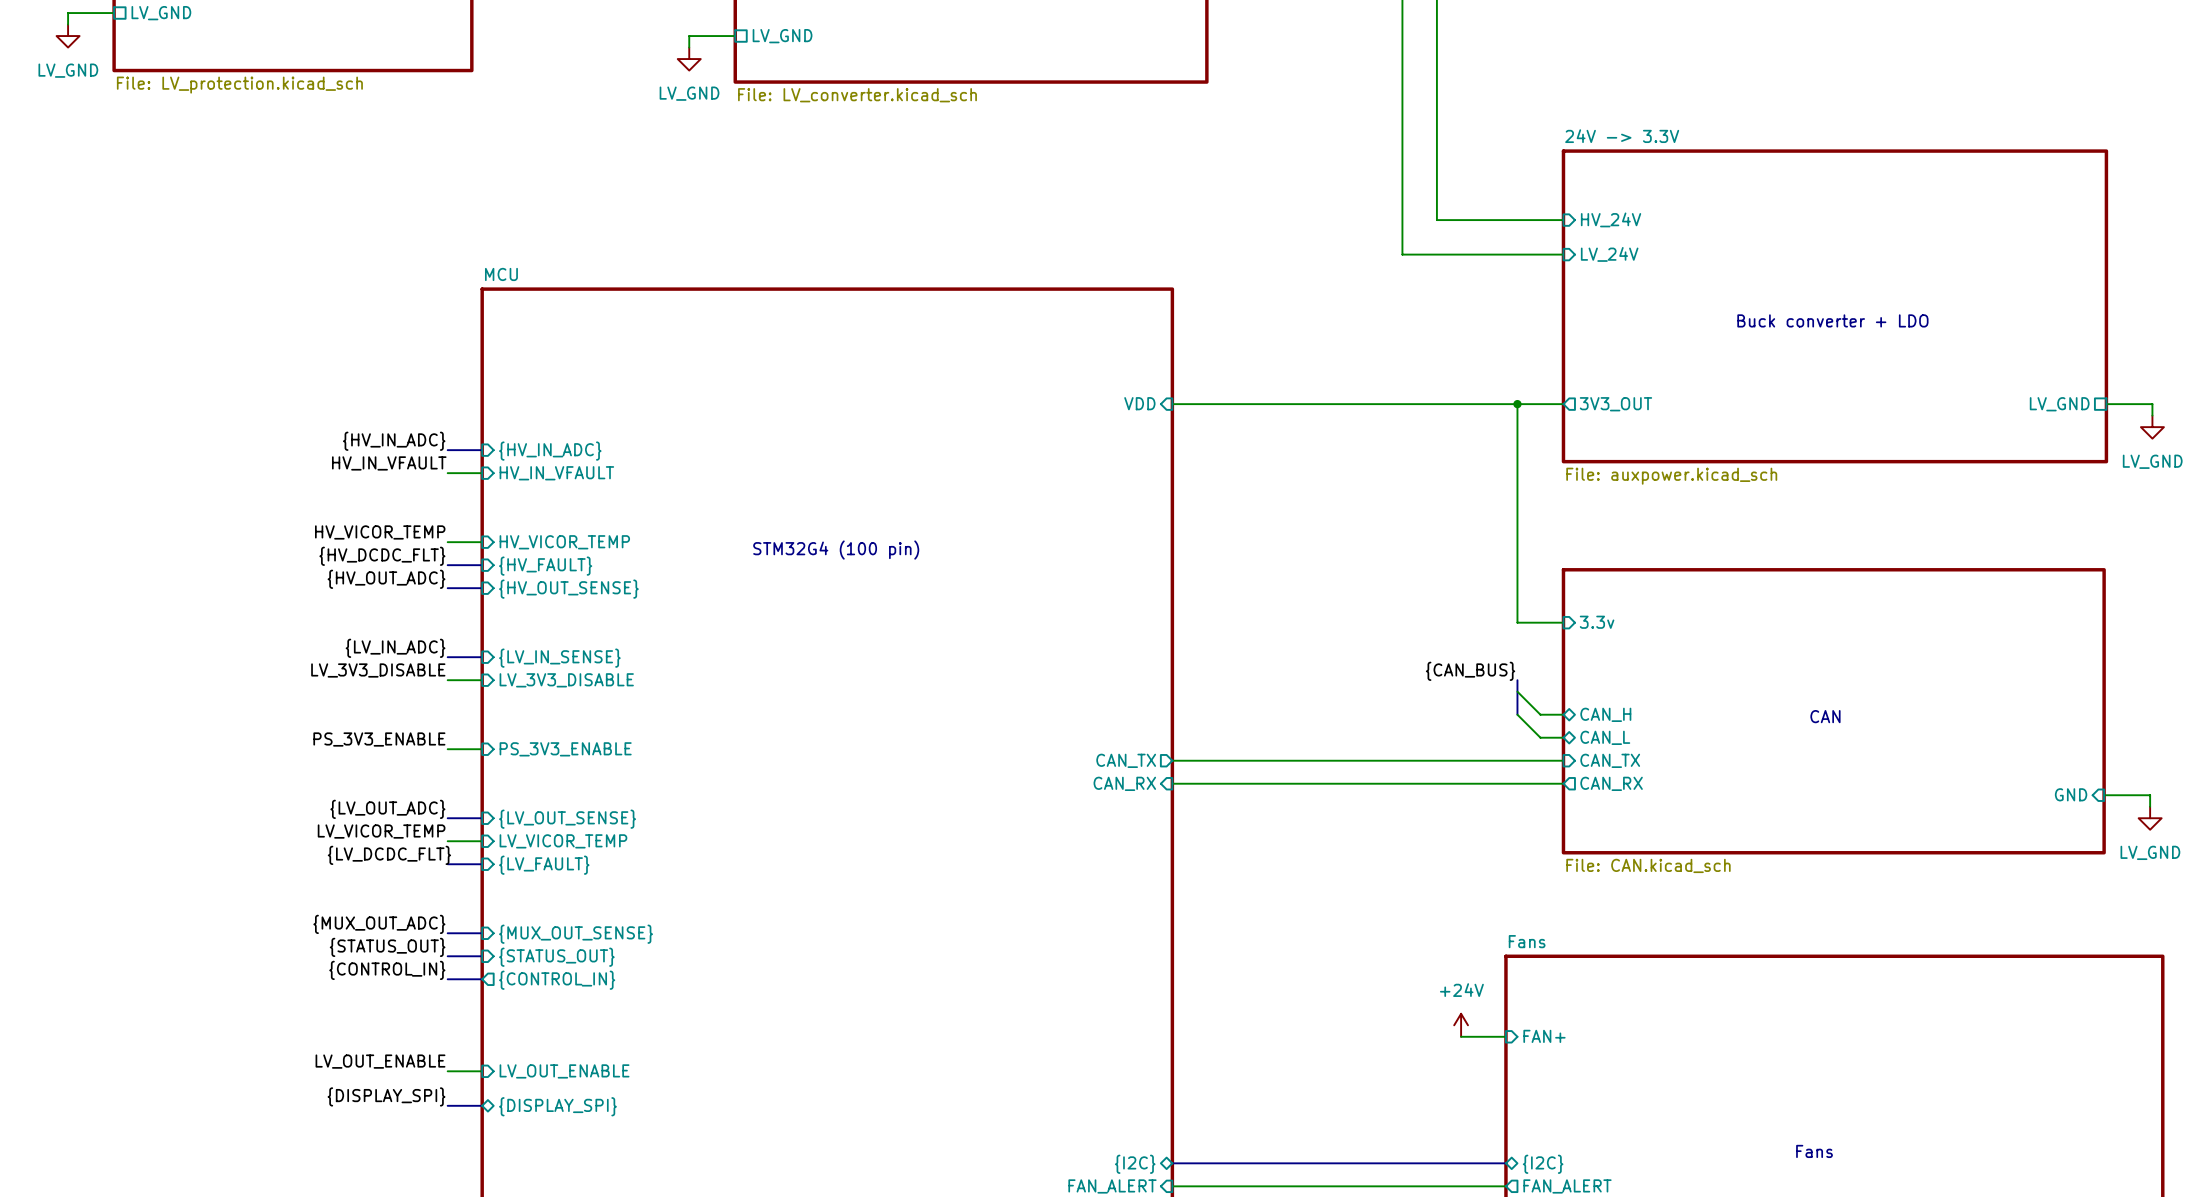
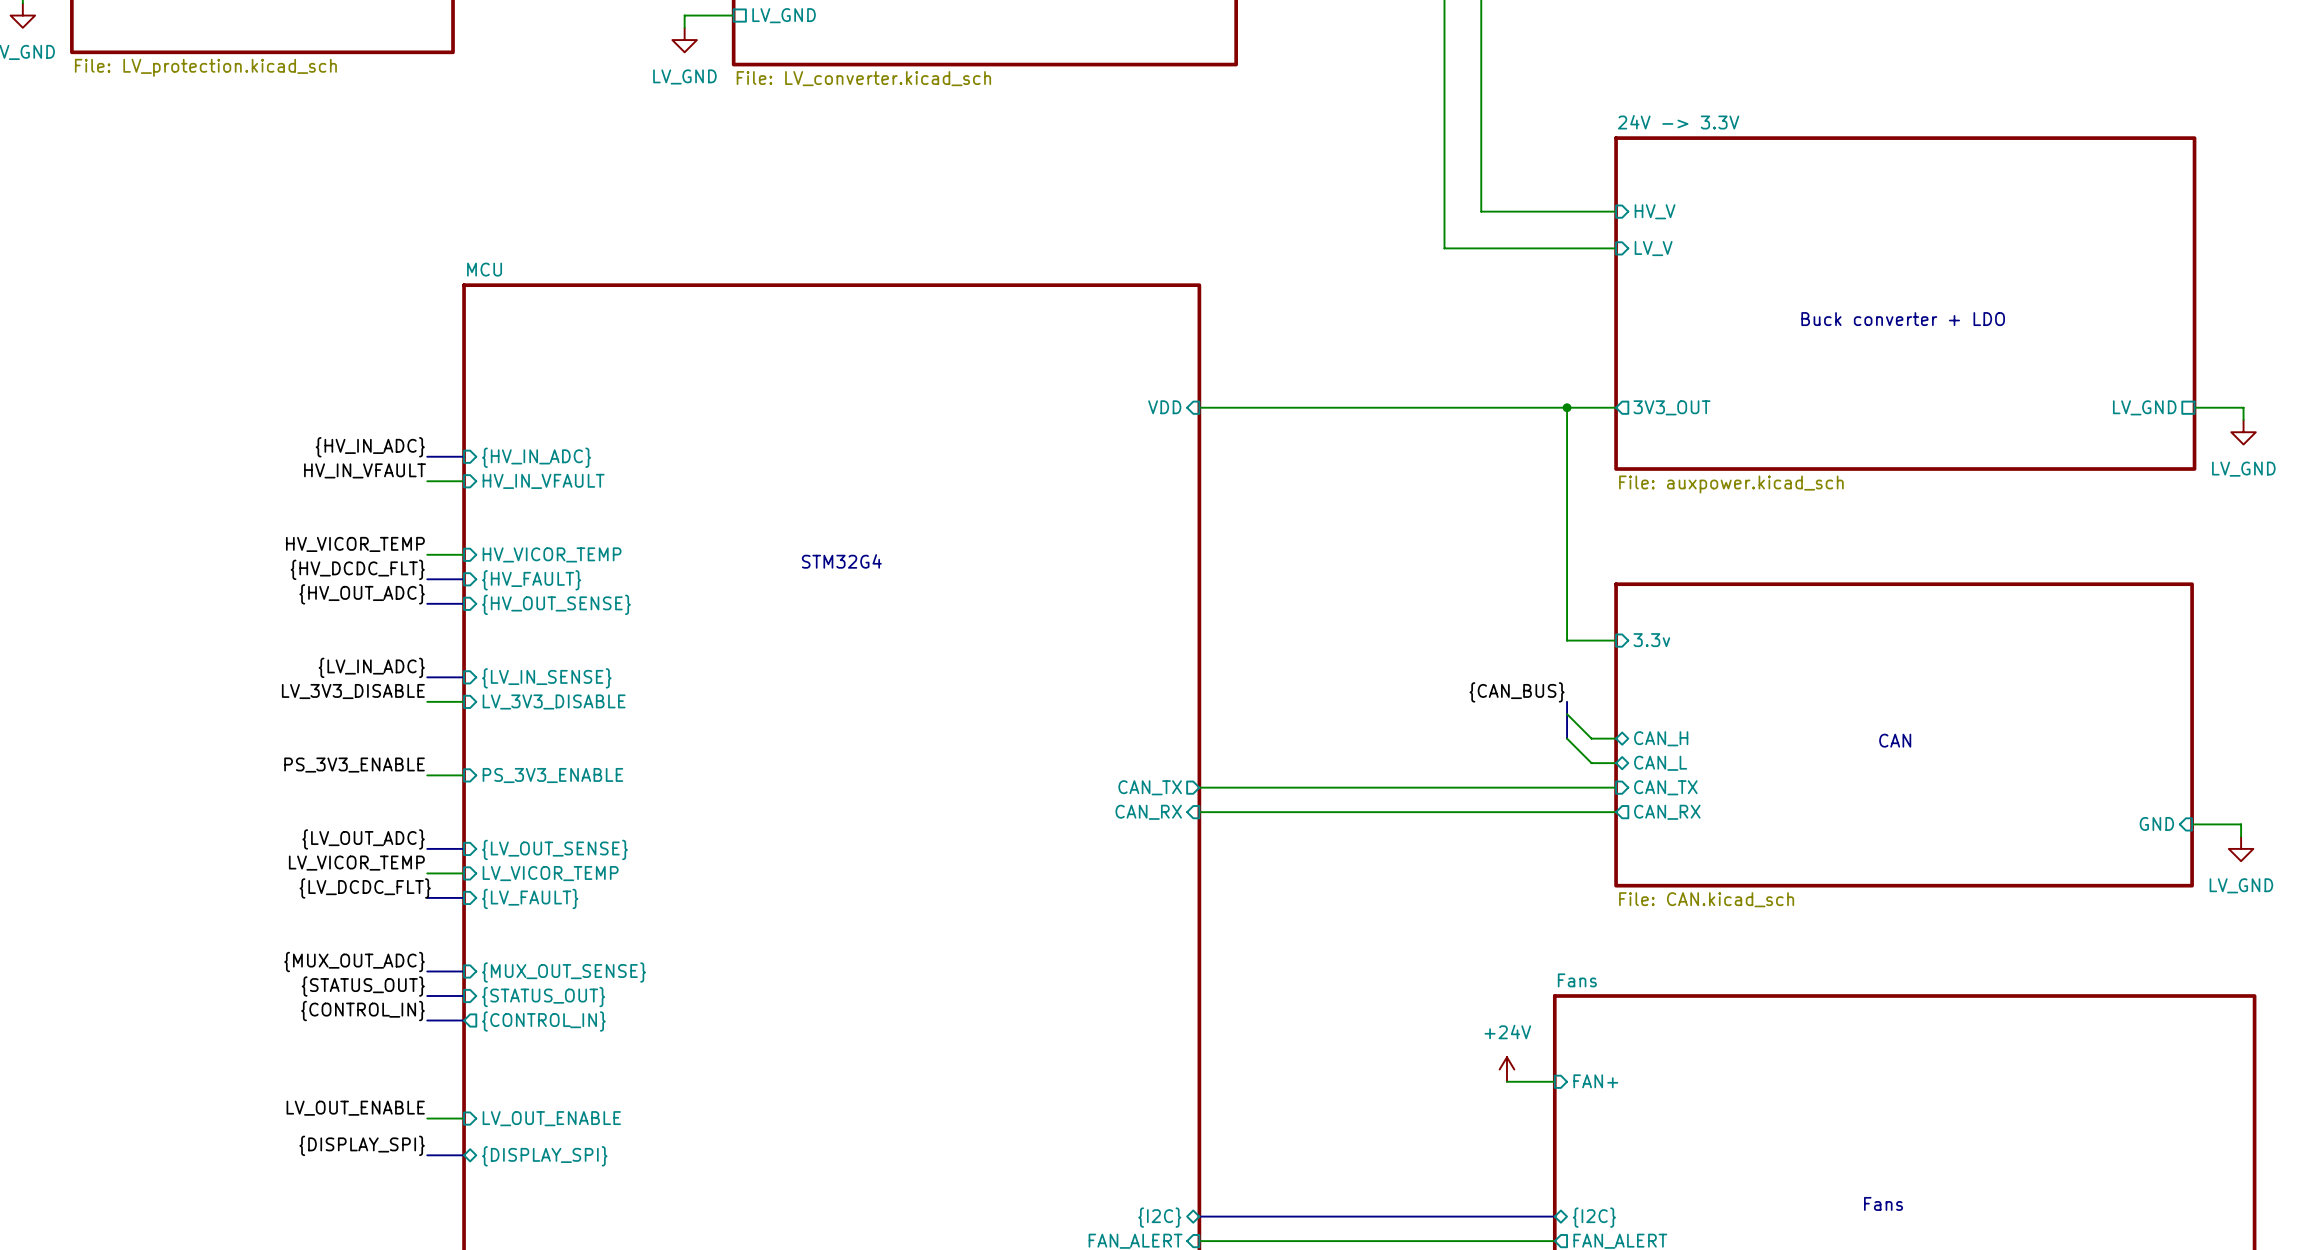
sheet pin: HV_24V (1611, 219) -> HV_V (1655, 211)
sheet pin: LV_24V (1609, 254) -> LV_V (1653, 248)
text: STM32G4 (100 pin) (836, 550) -> STM32G4 (841, 561)

